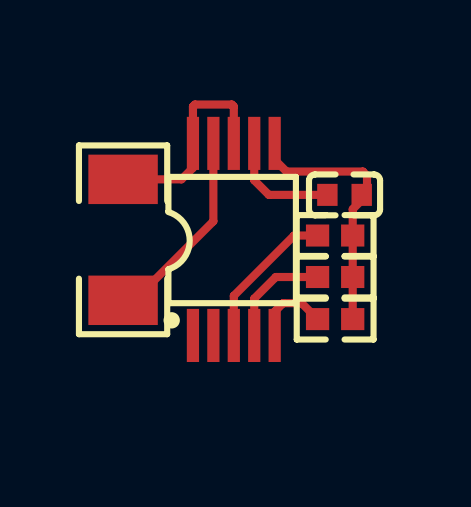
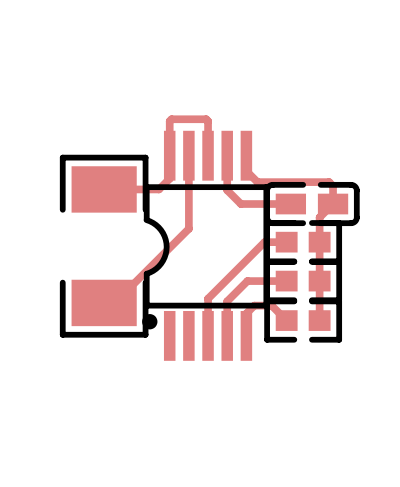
part footprint: [305, 171, 384, 219] -> [264, 181, 360, 227]

